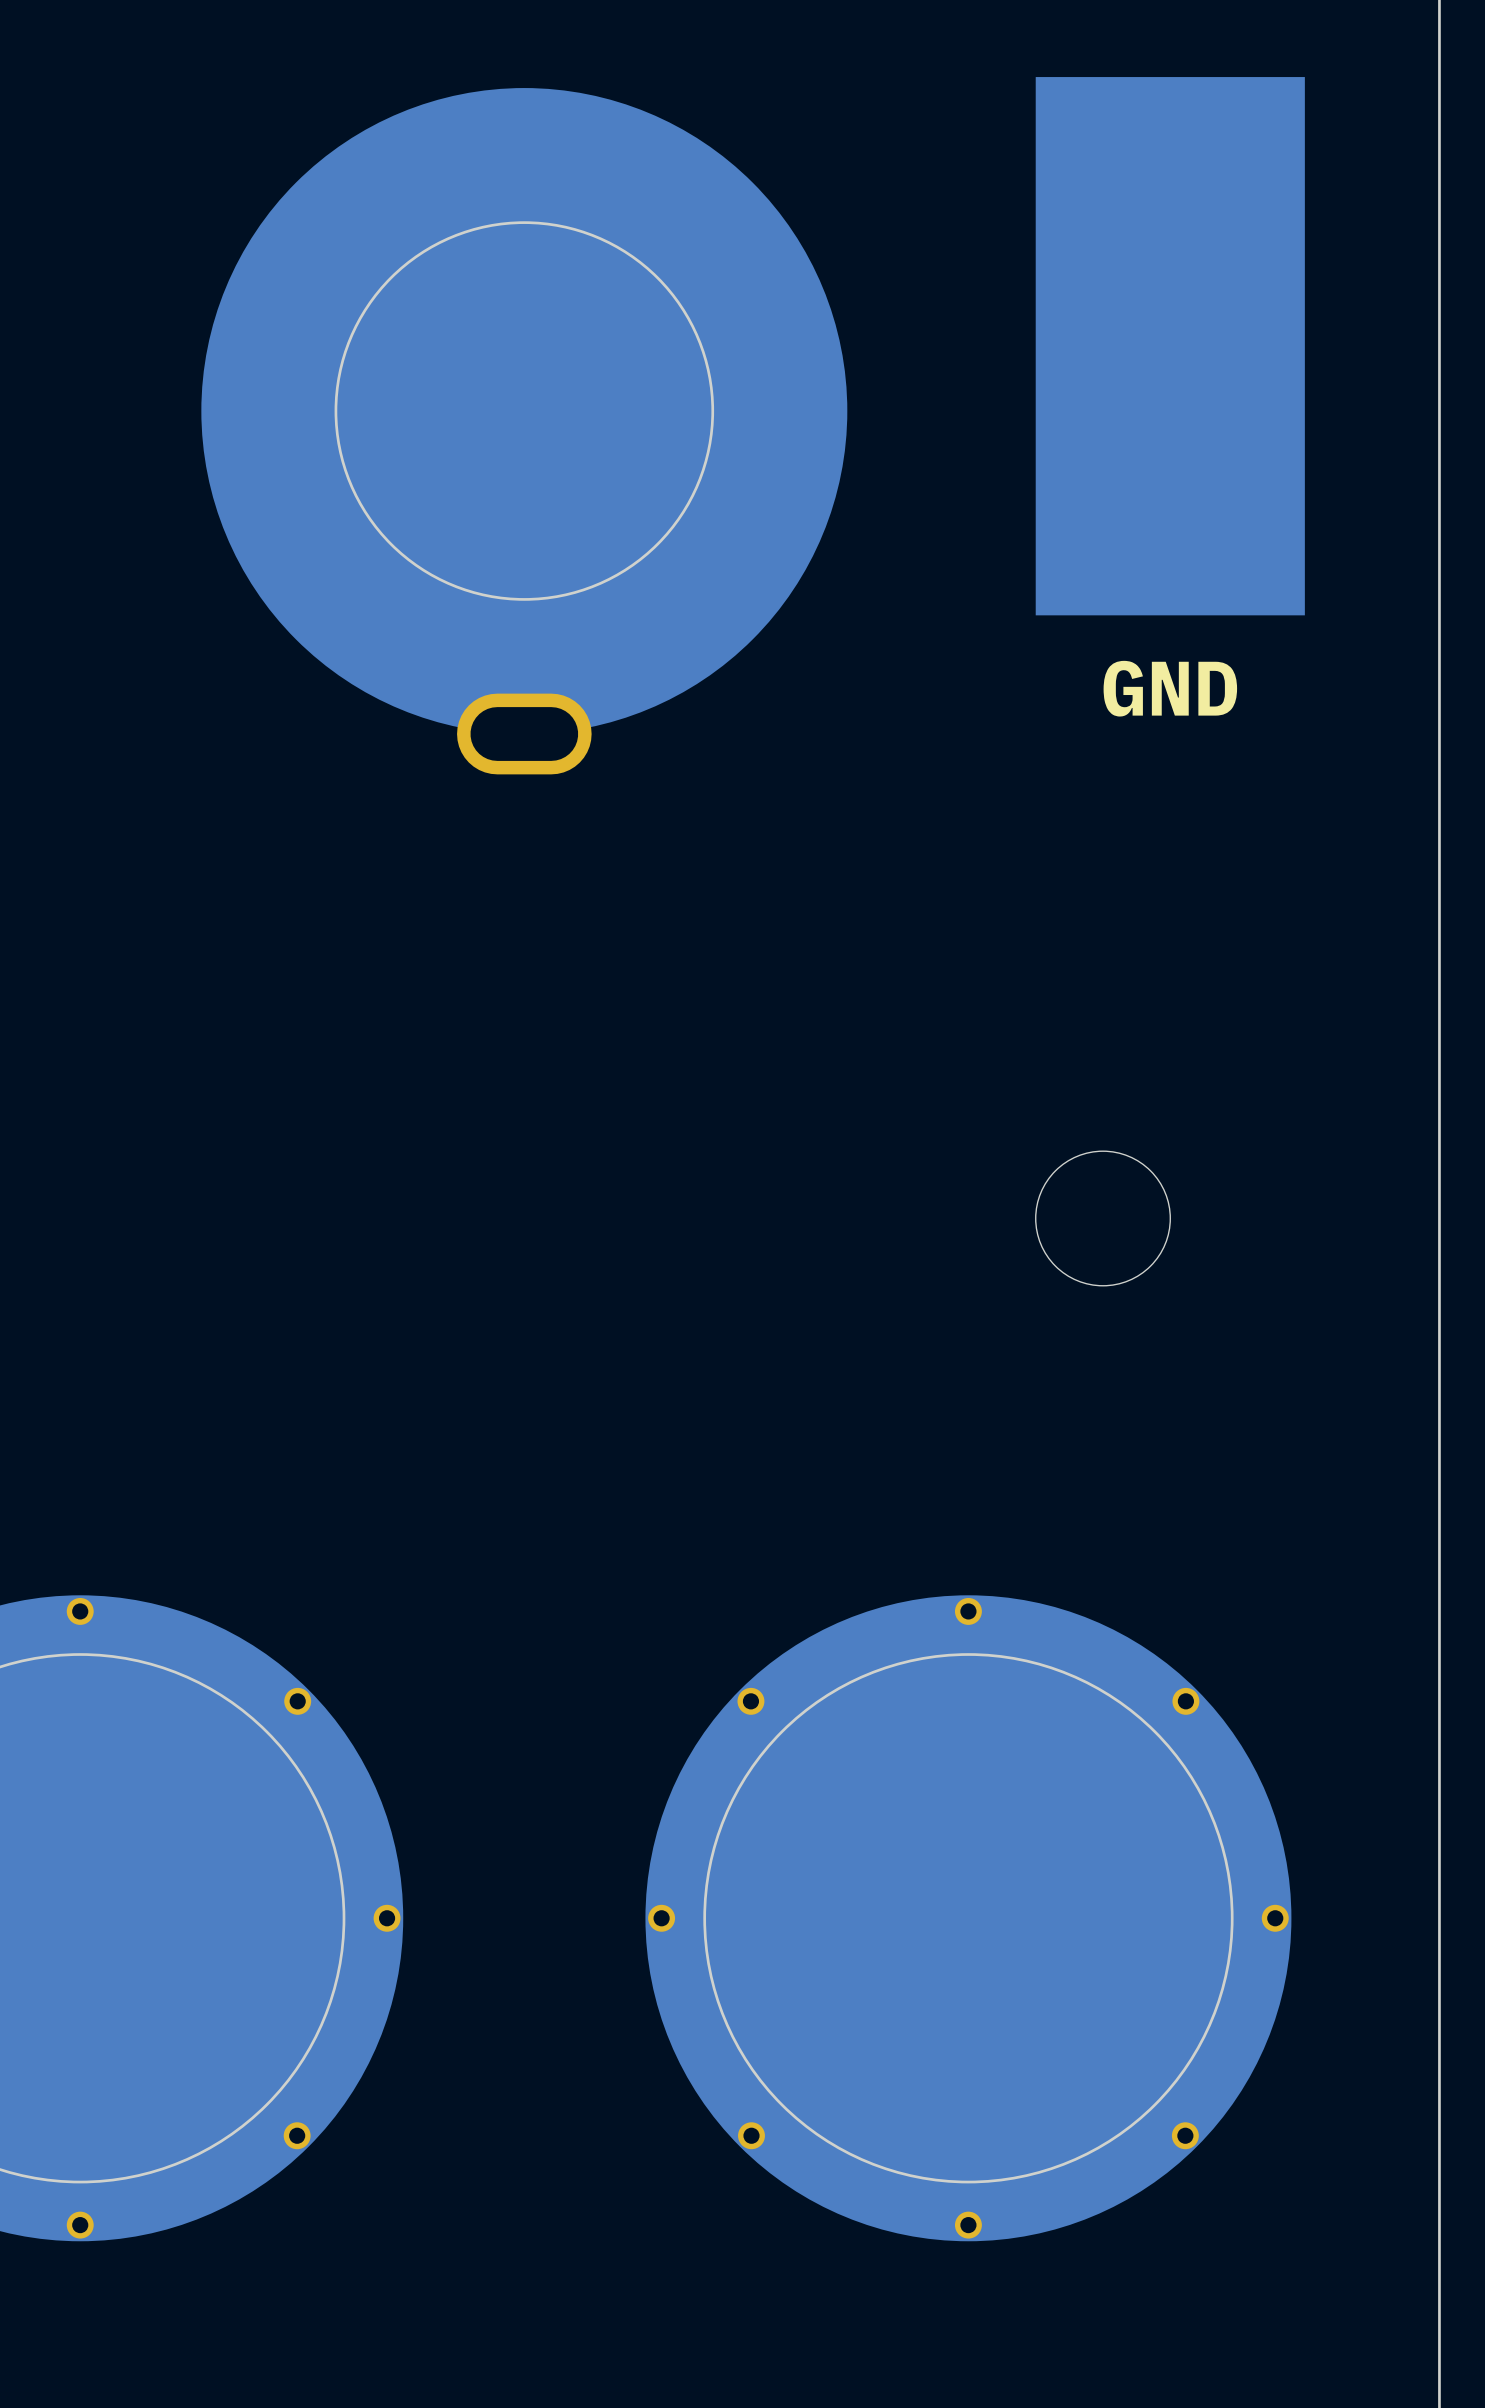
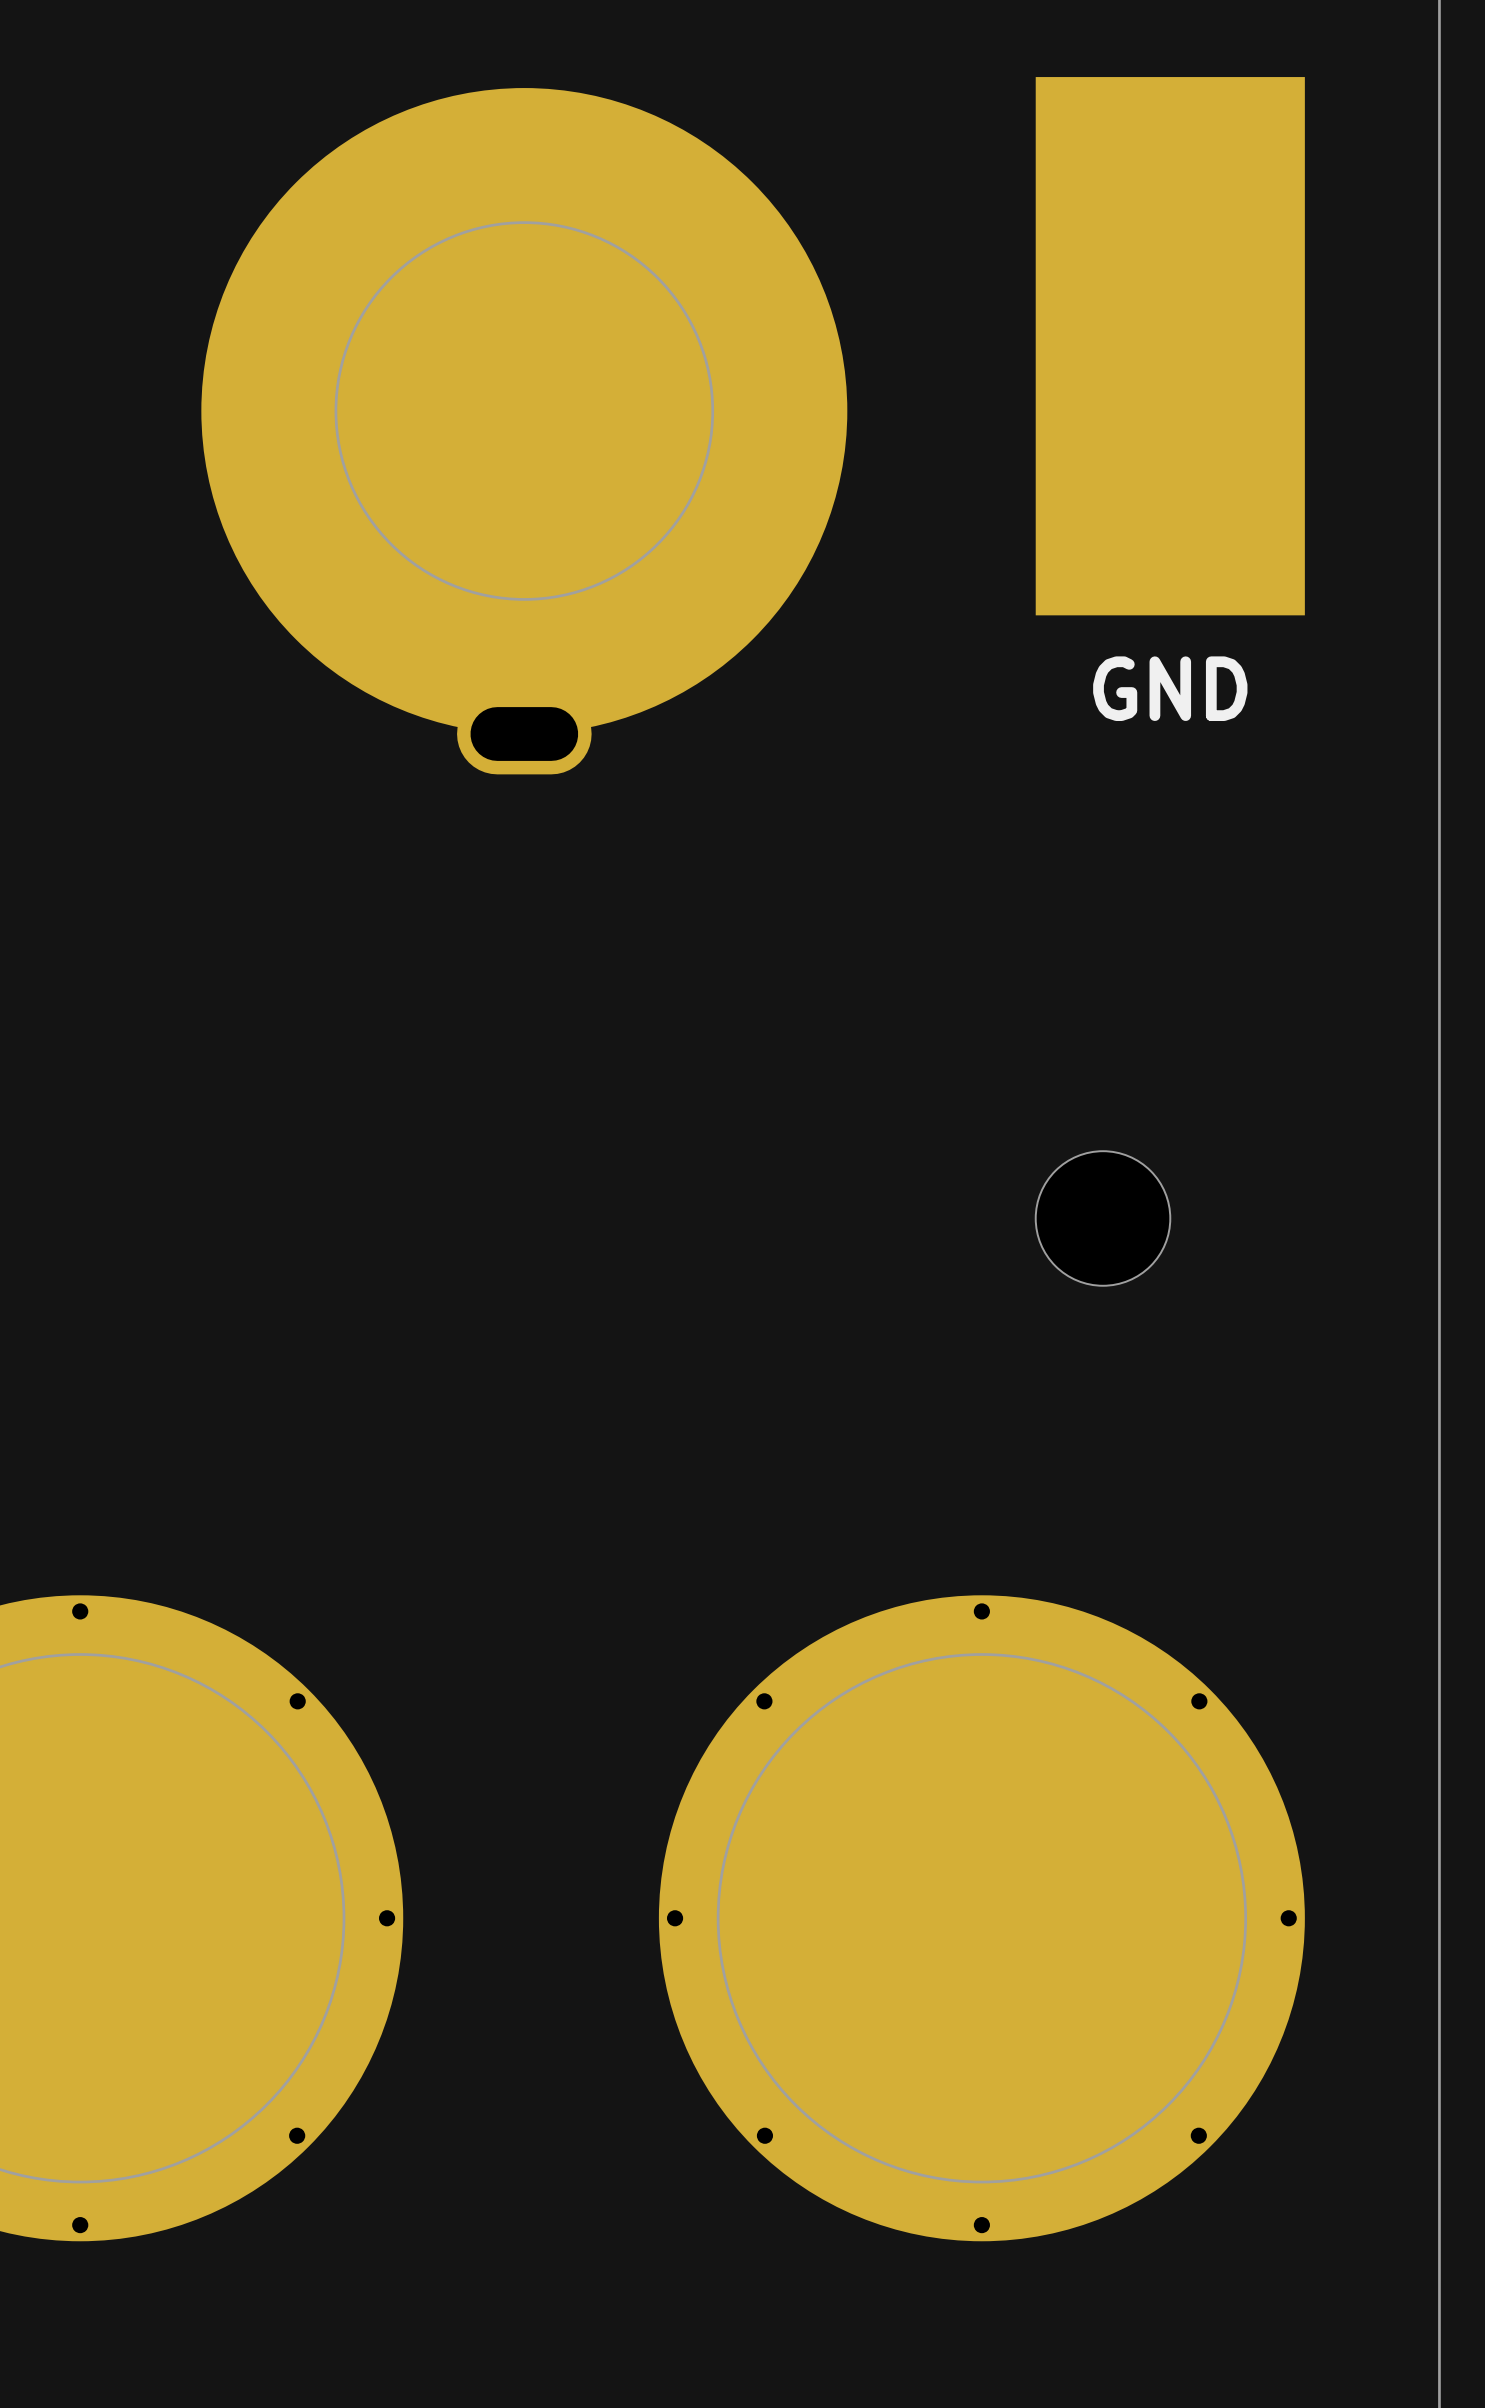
part position: (968, 1918) -> (981, 1918)

